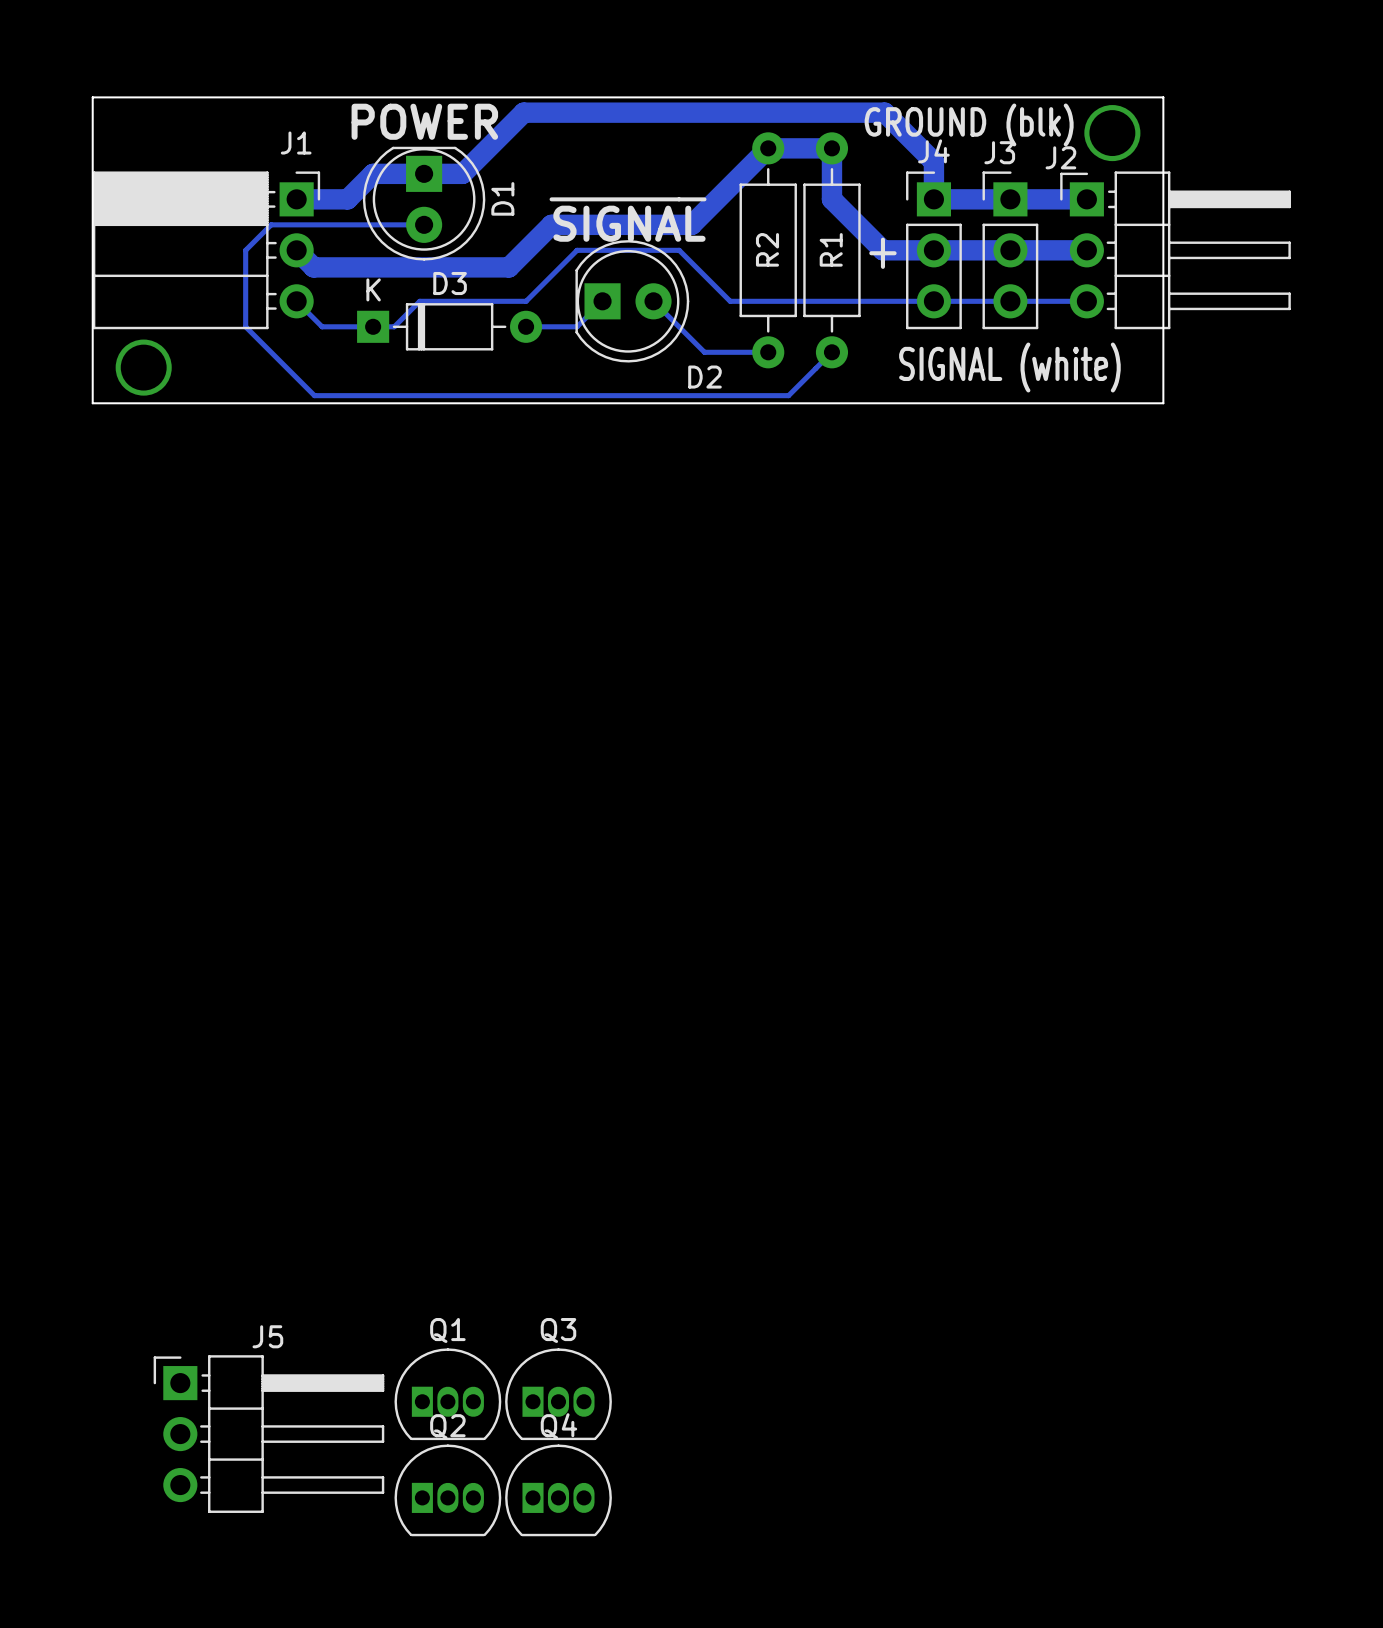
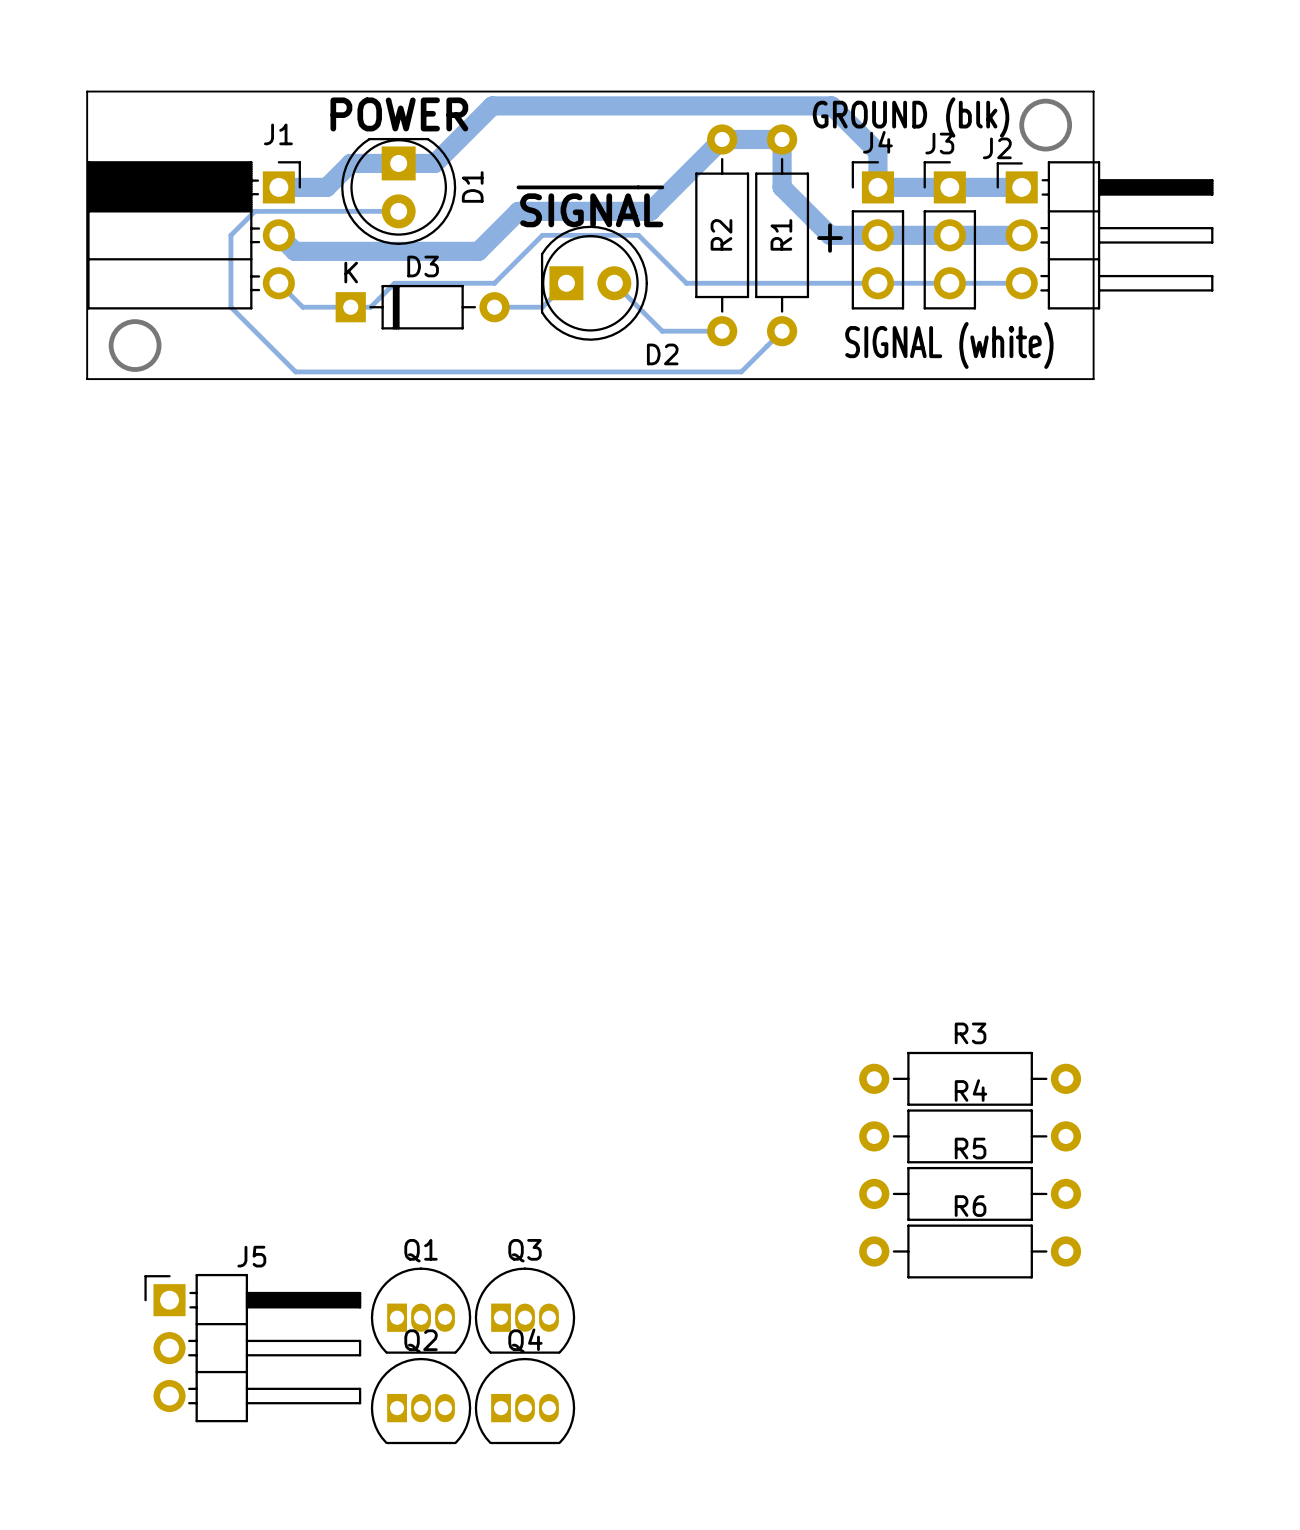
R3: none -> (970, 1078)
R4: none -> (970, 1136)
R5: none -> (970, 1193)
R6: none -> (970, 1251)

